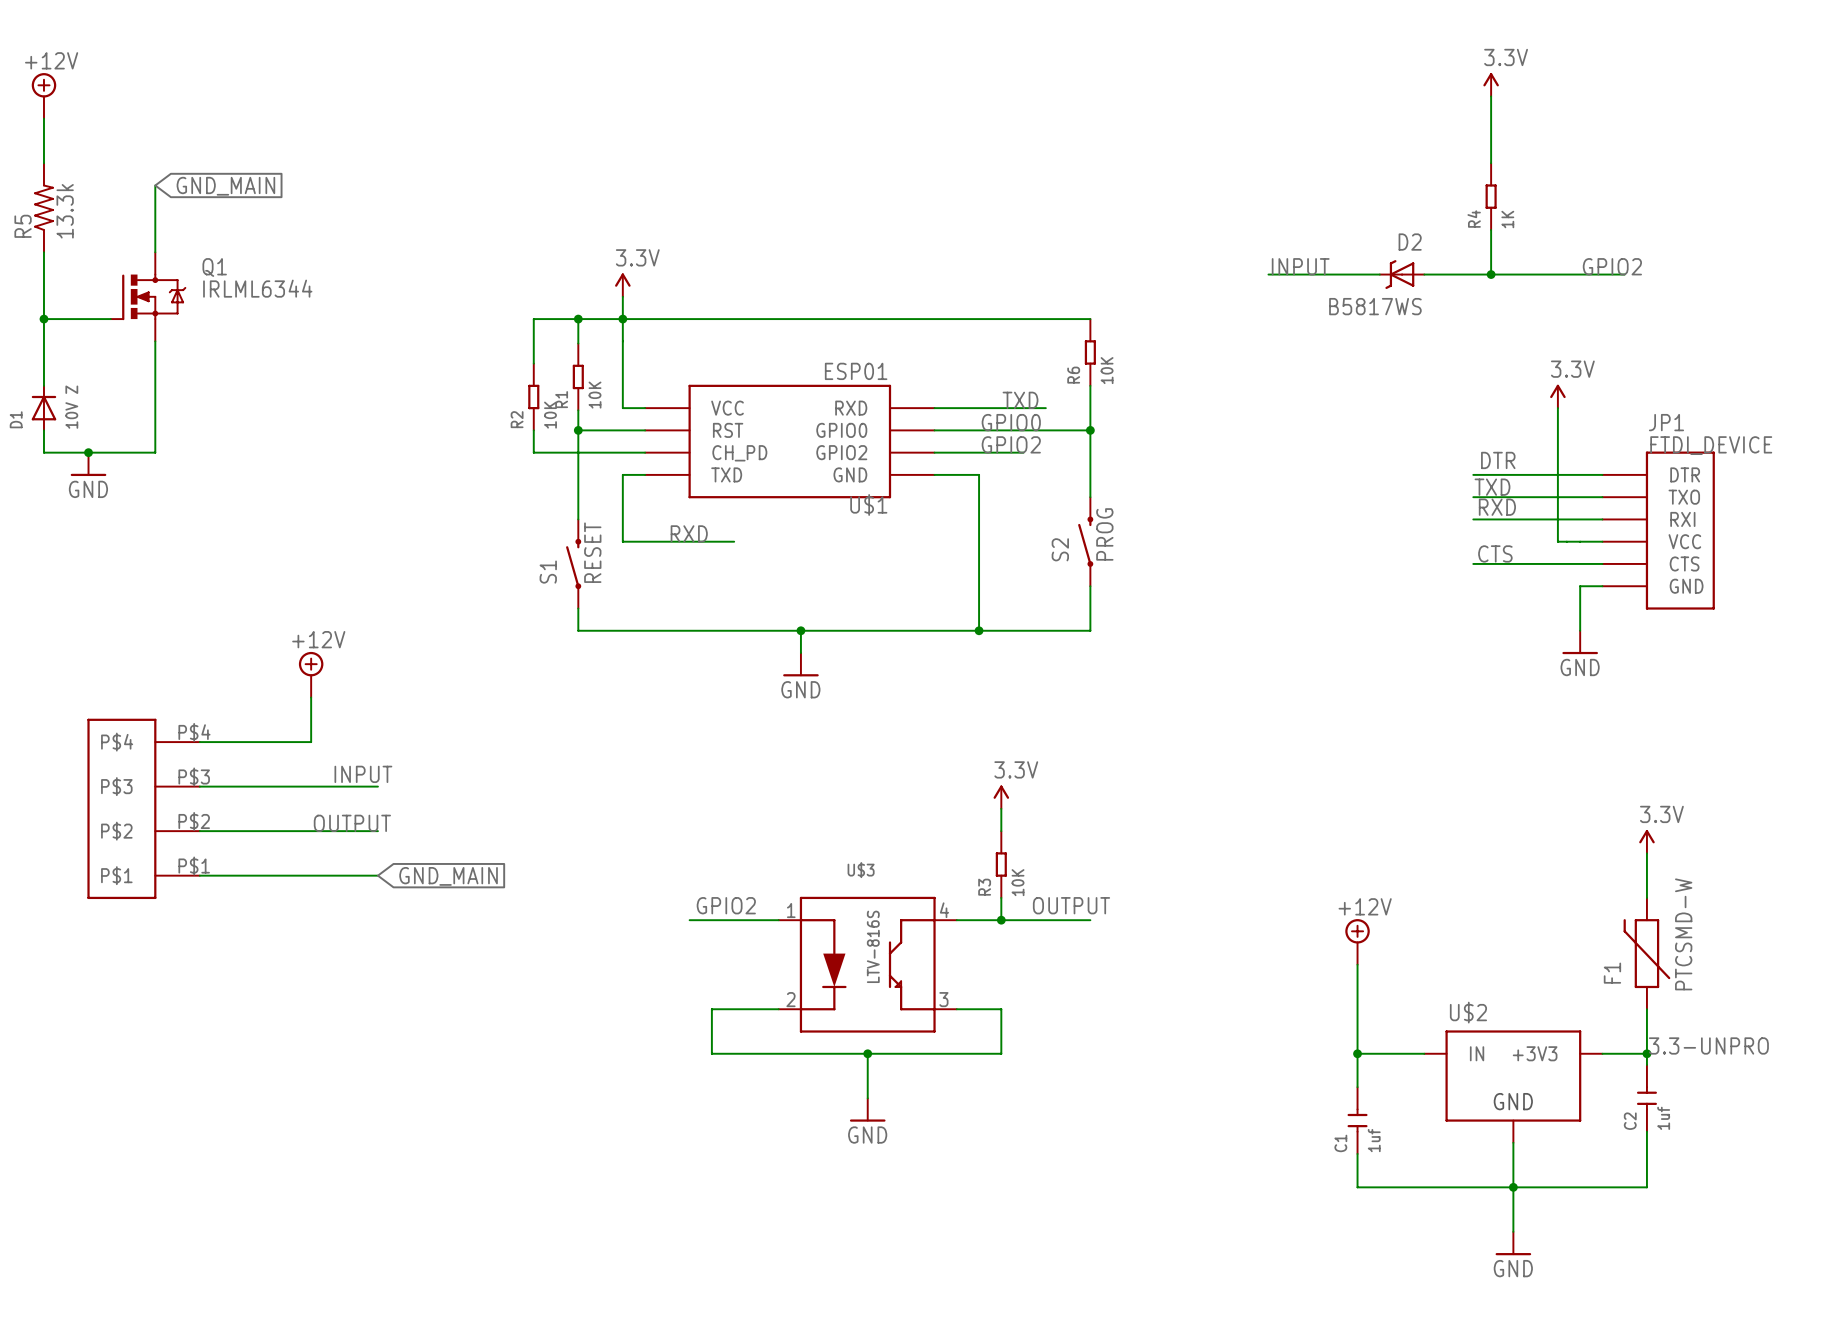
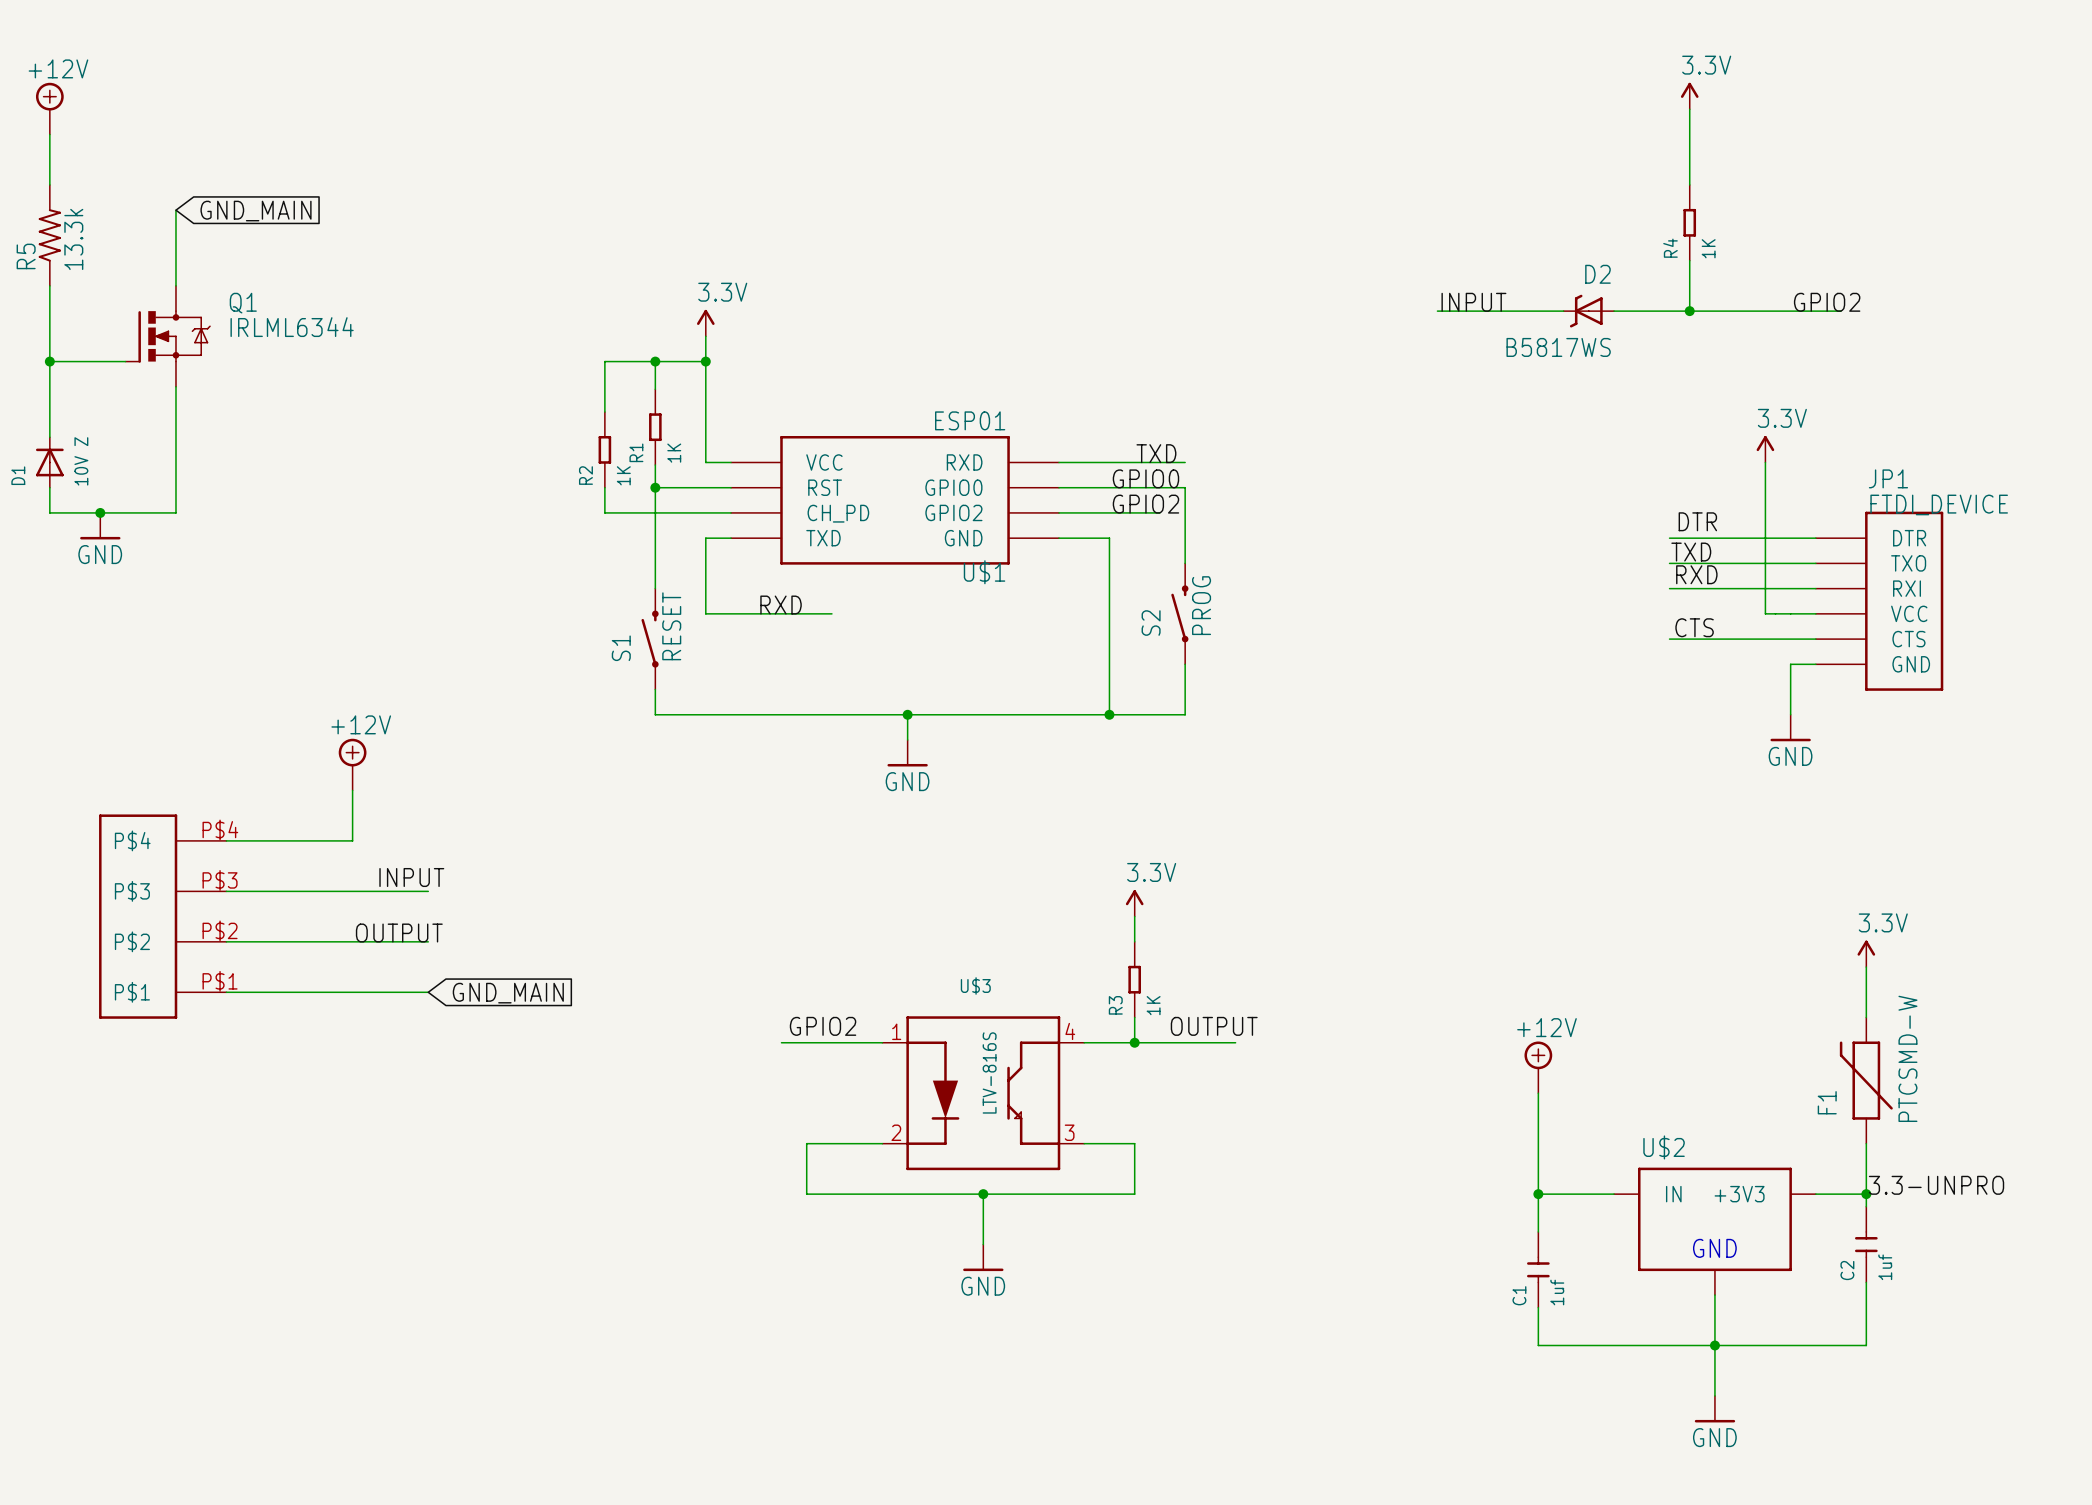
wire: (622, 319) (1090, 319) -> none
R6: 10K (1090, 352) -> none
wire: (1090, 385) (1090, 497) -> none
R1 value: 10K (595, 395) -> 1K (674, 453)
R2 value: 10K (550, 415) -> 1K (623, 475)
wire: (1045, 430) (1090, 430) -> (1185, 487) (1185, 563)
junction: (1090, 430) -> none
S2 position: (1085, 541) -> (1179, 613)
wire: (1090, 586) (1090, 630) (1045, 630) -> (1185, 664) (1185, 714)
R3 value: 10K (1018, 882) -> 1K (1153, 1005)

